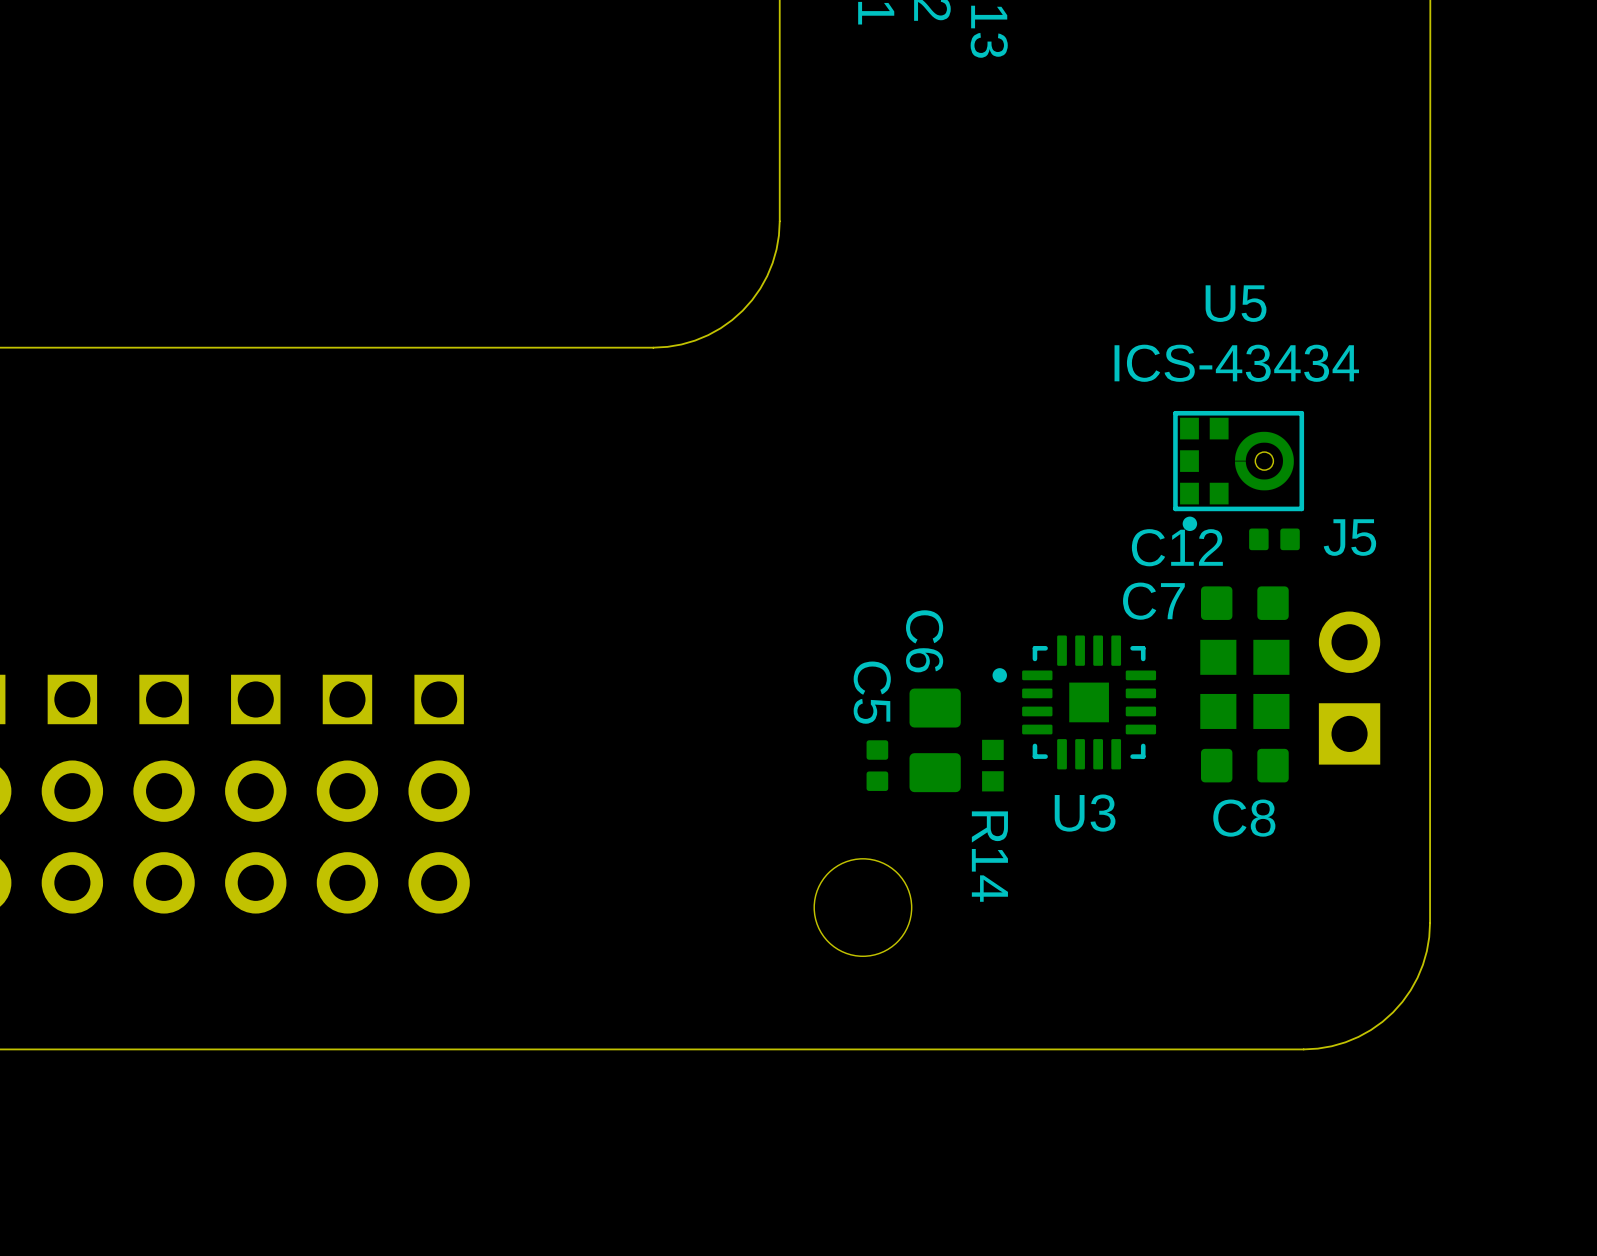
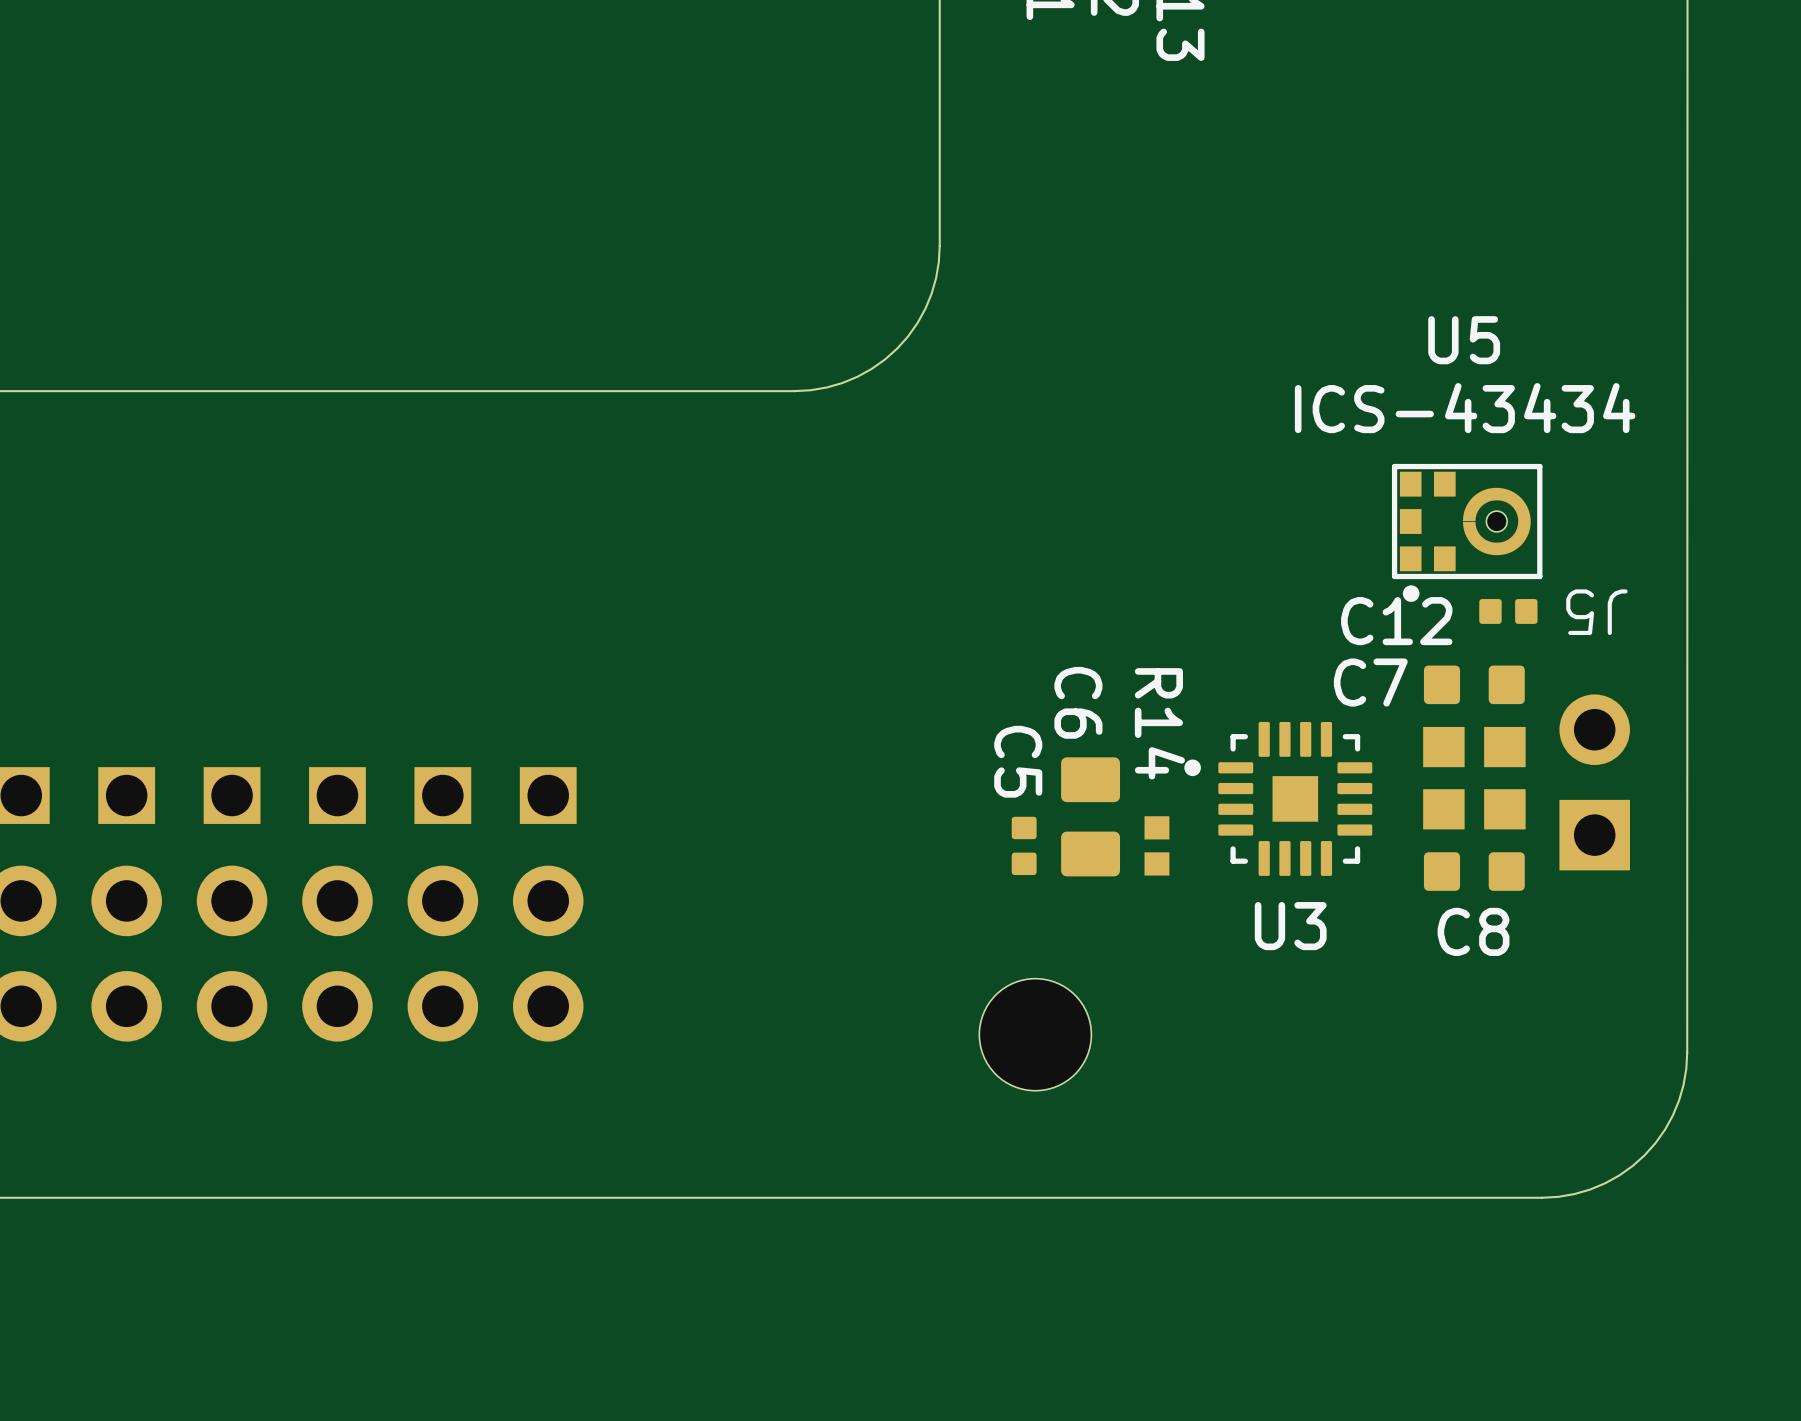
J5 name rotation: 0° (1349, 537) -> 180° (1596, 612)
C6 position: (935, 740) -> (1090, 816)
C5 position: (877, 765) -> (1024, 845)
R14 position: (992, 765) -> (1156, 845)
R14 name position: R14 (989, 856) -> R14 (1159, 723)

